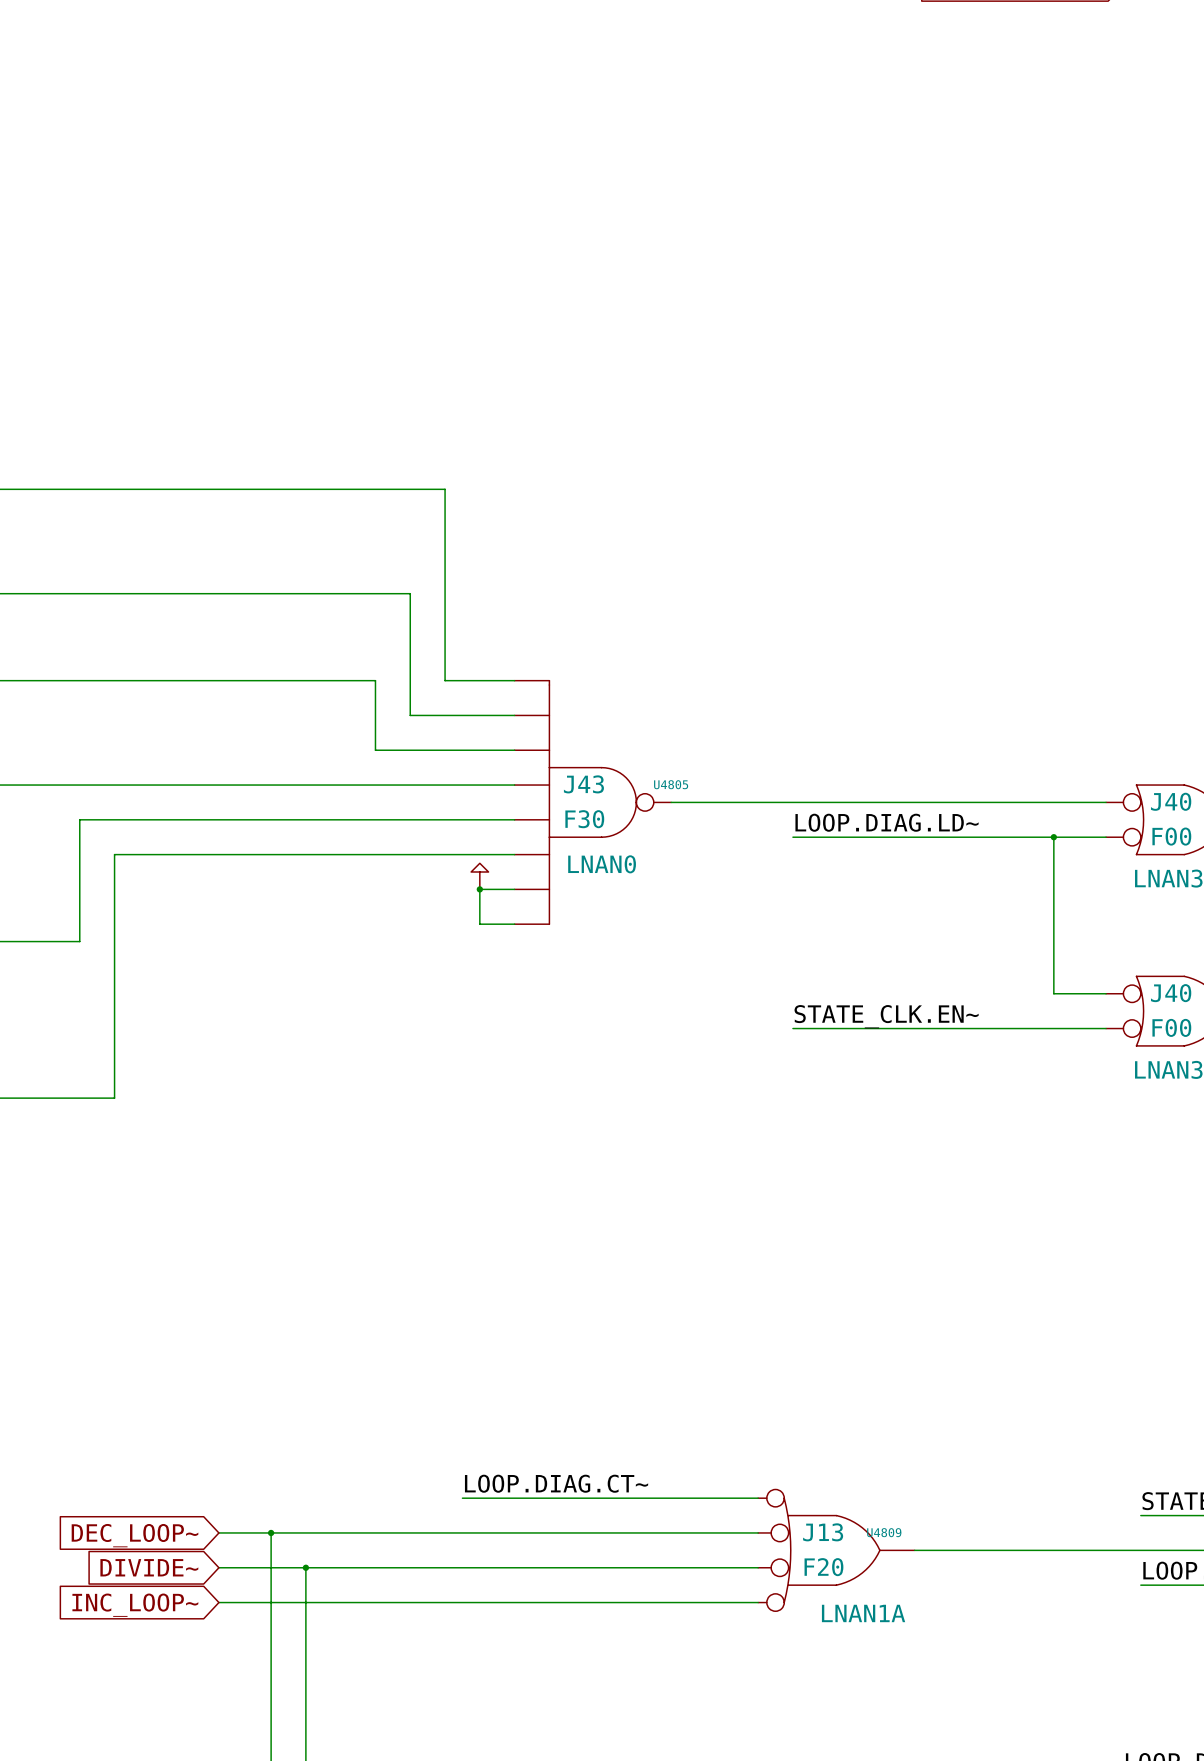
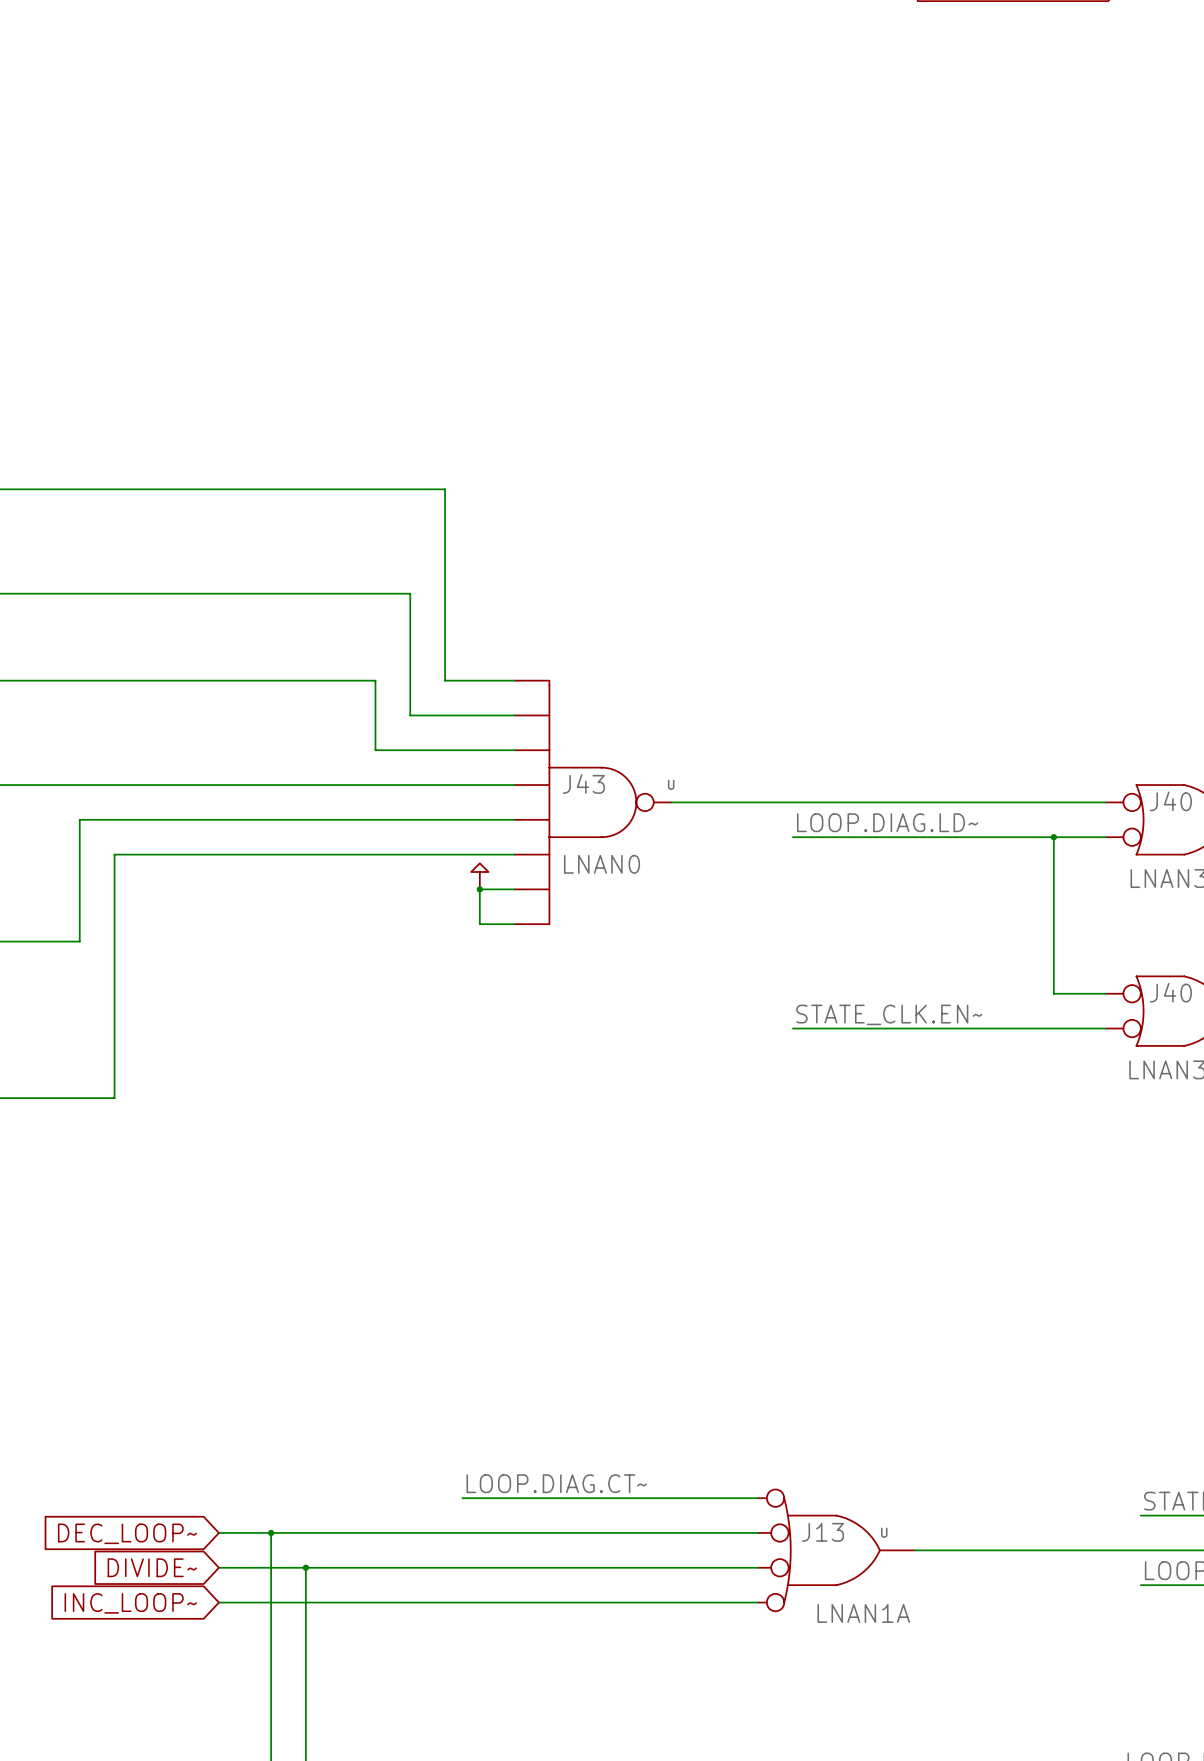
U4805 name: U4805 (671, 784) -> U (671, 784)
U4805 value: F30 (584, 819) -> none
part value: F00 (1171, 836) -> none
part value: F00 (1171, 1027) -> none
U4809 name: U4809 (884, 1532) -> U (884, 1532)
U4809 value: F20 (823, 1567) -> none

